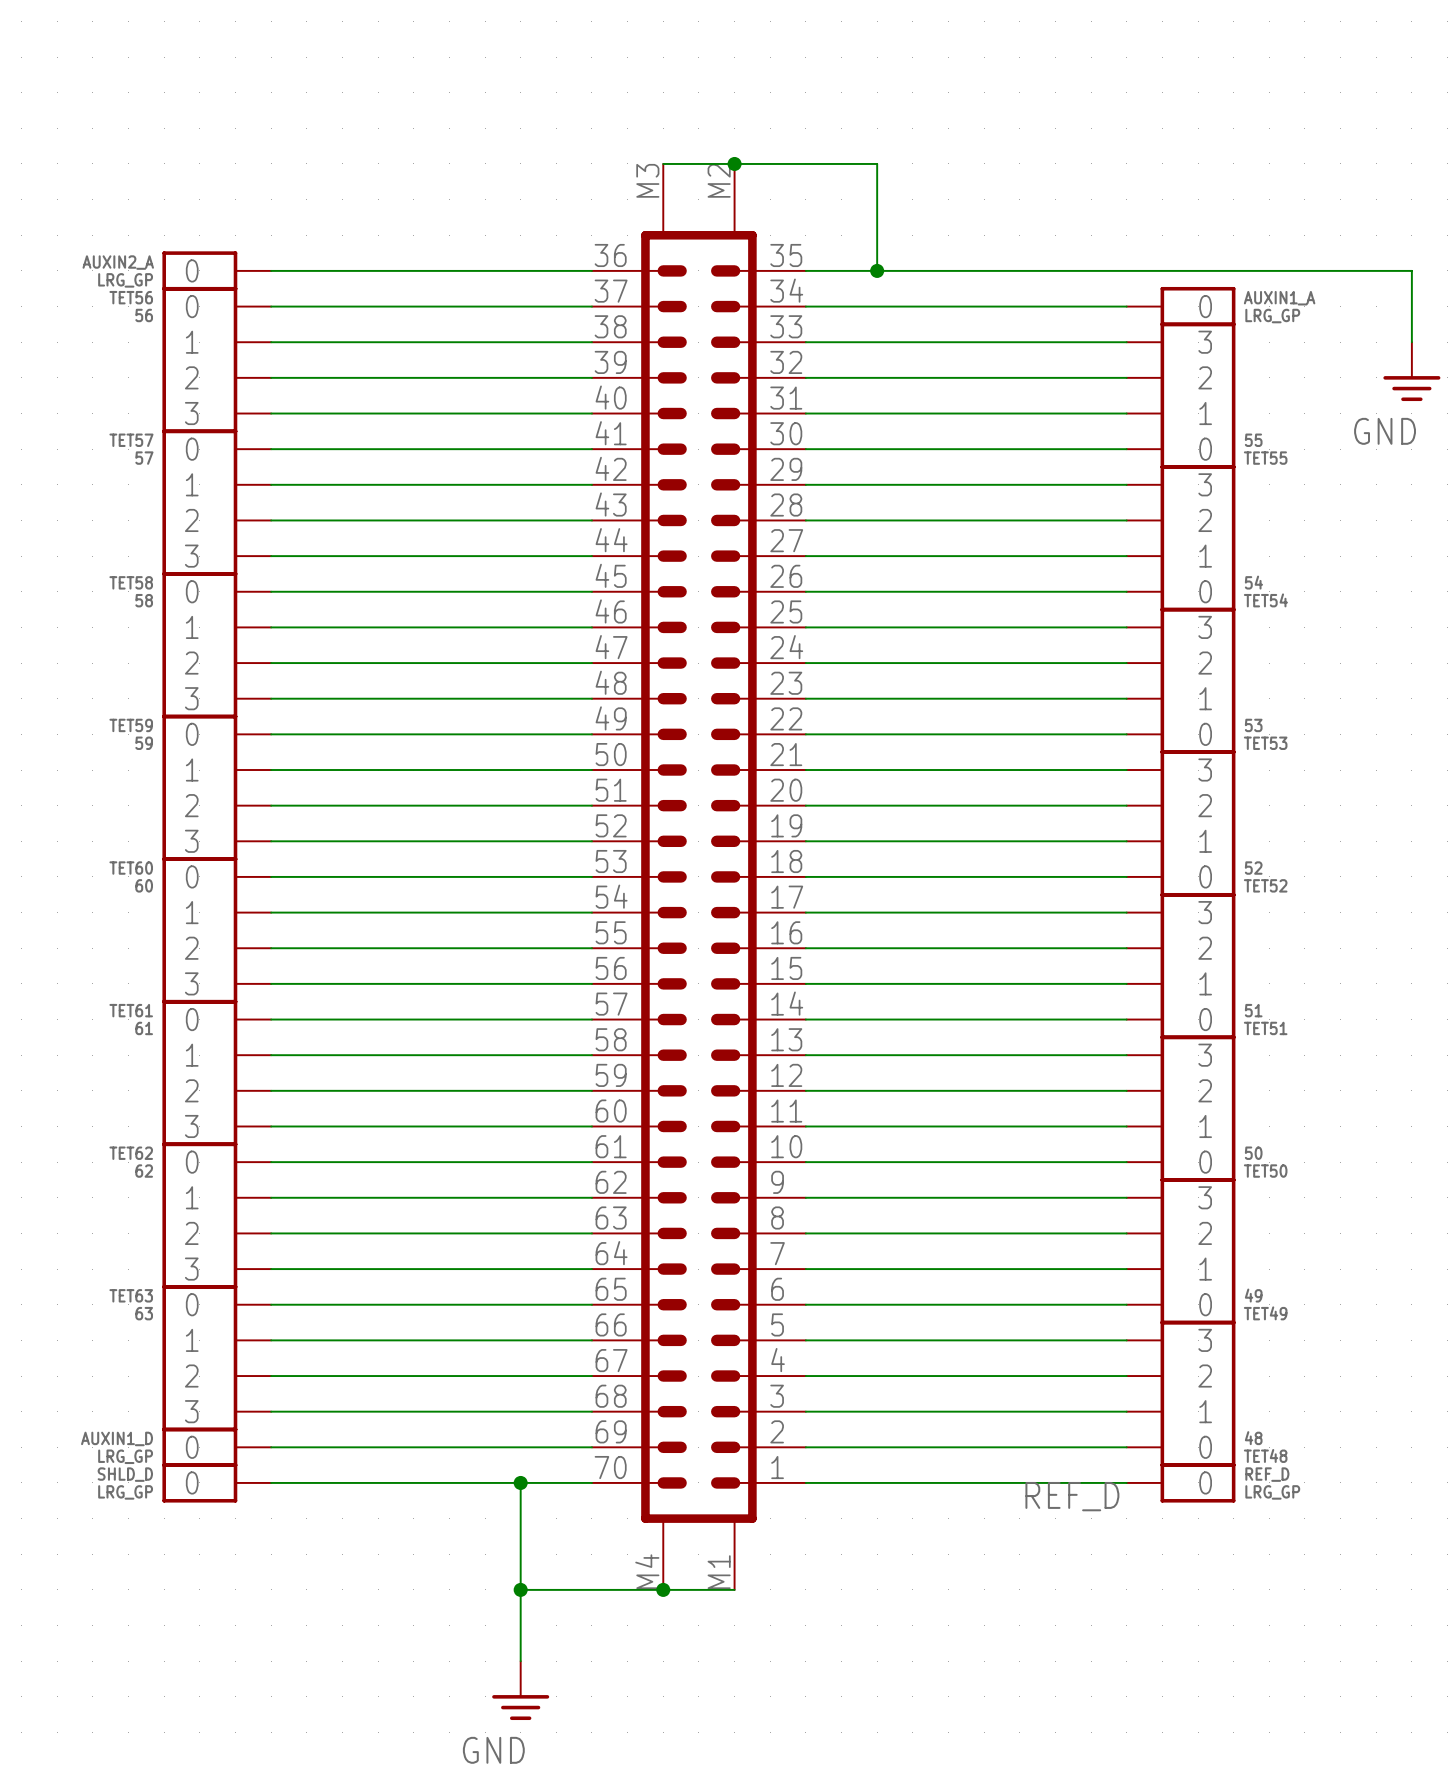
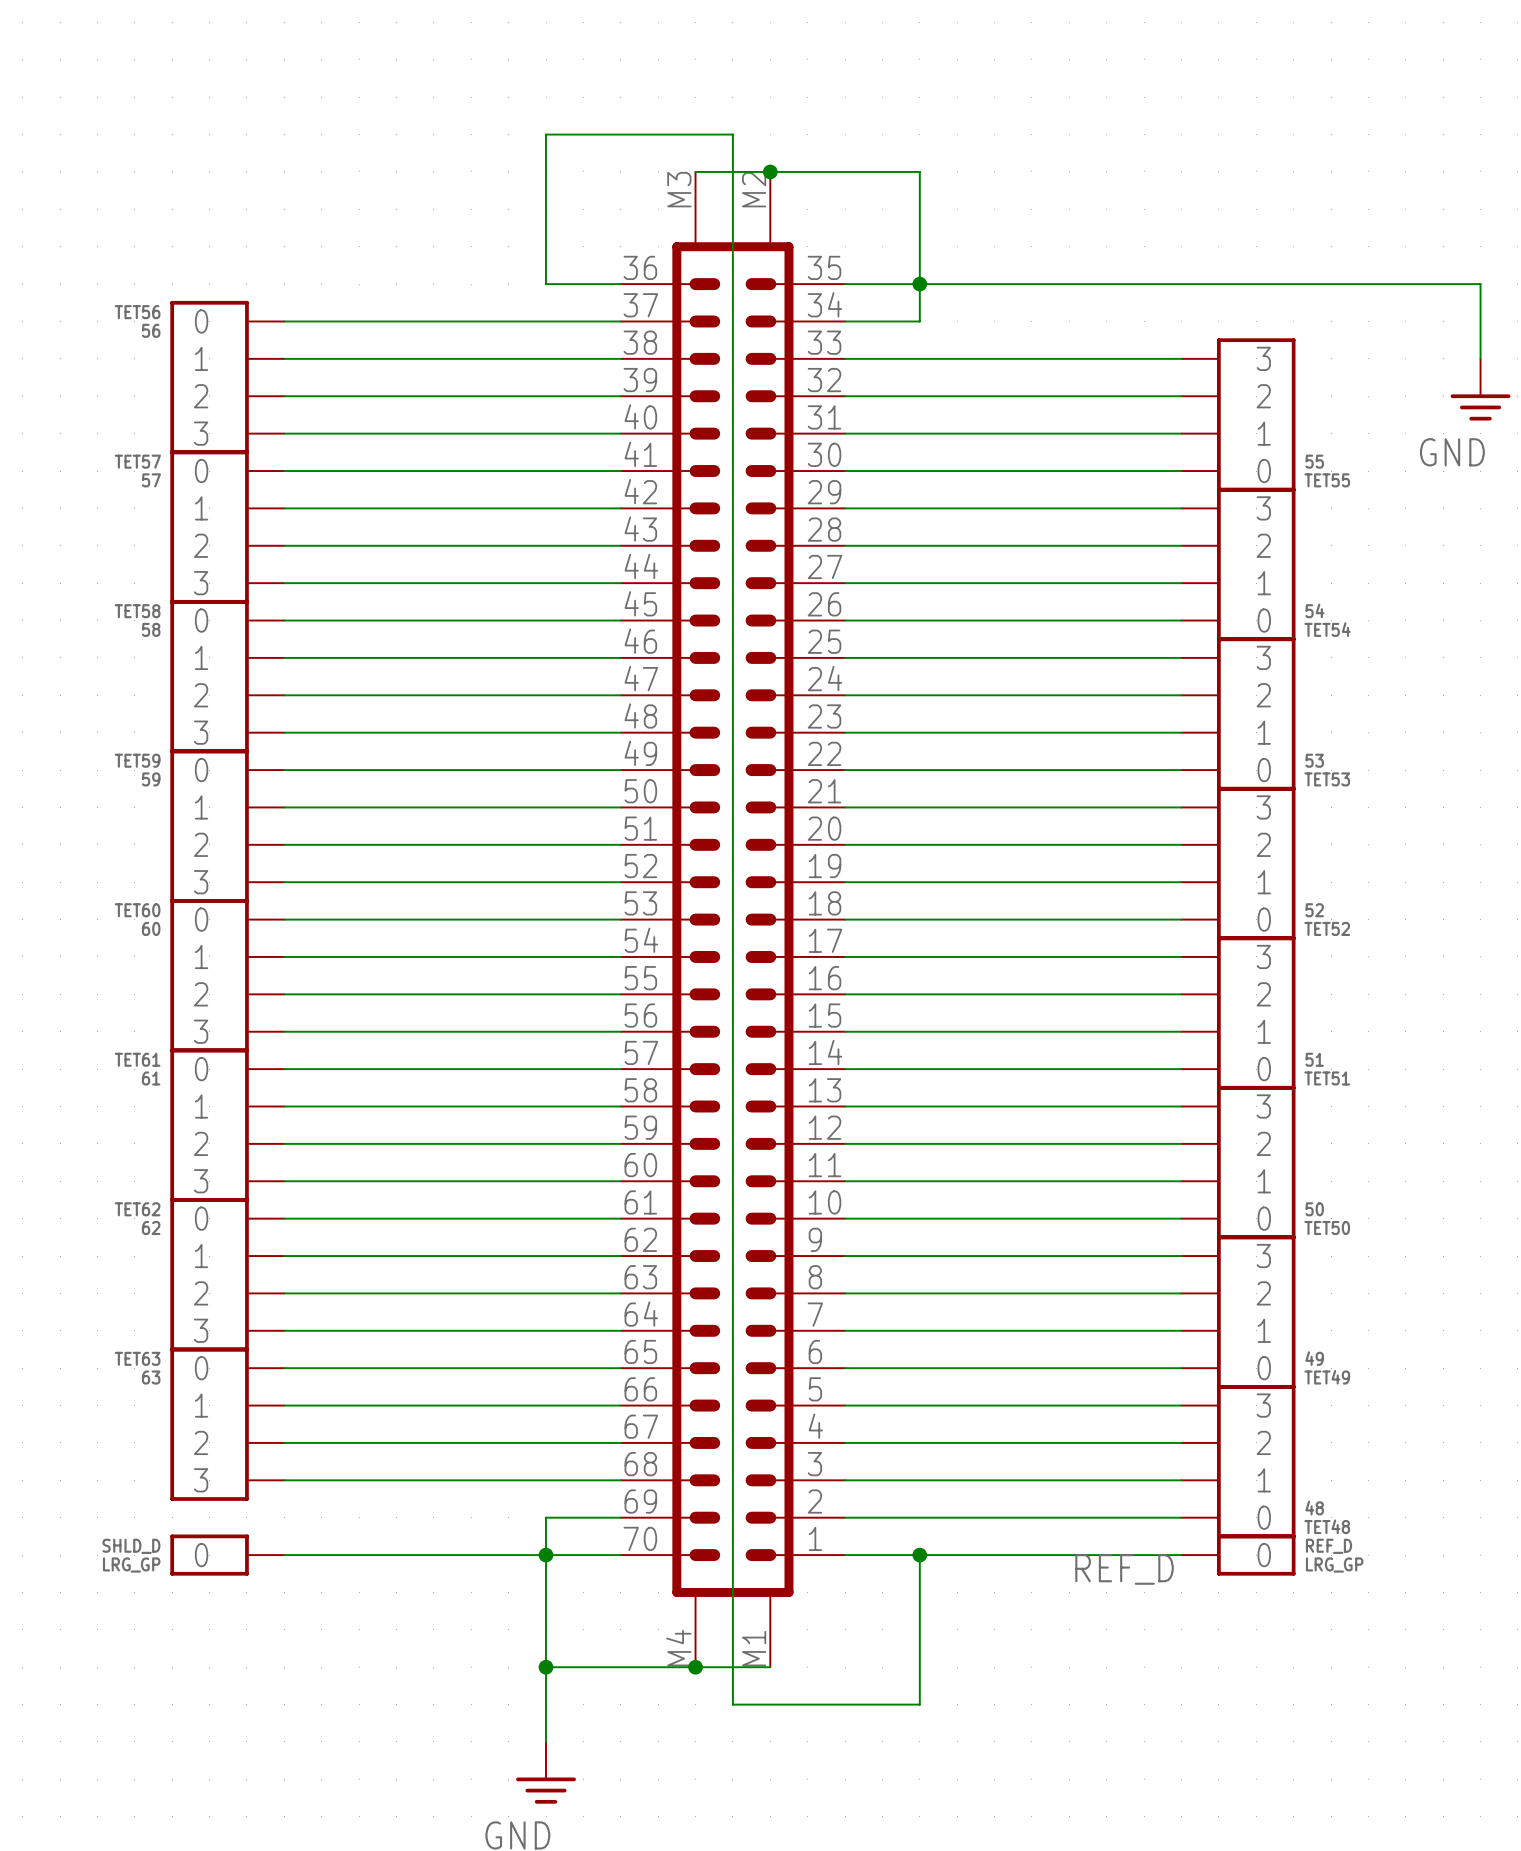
AUXIN2_A: LRG_GP (216, 270) -> none
wire: (271, 270) (520, 270) -> (919, 1555) (919, 1704) (732, 1704) (732, 134) (546, 134) (546, 284)
wire: (877, 306) (1126, 306) -> (919, 321) (919, 284)
AUXIN1_A: LRG_GP (1181, 306) -> none
AUXIN1_D: LRG_GP (216, 1447) -> none
wire: (271, 1447) (520, 1447) -> (546, 1555) (546, 1517)
junction: none -> (919, 1555)

